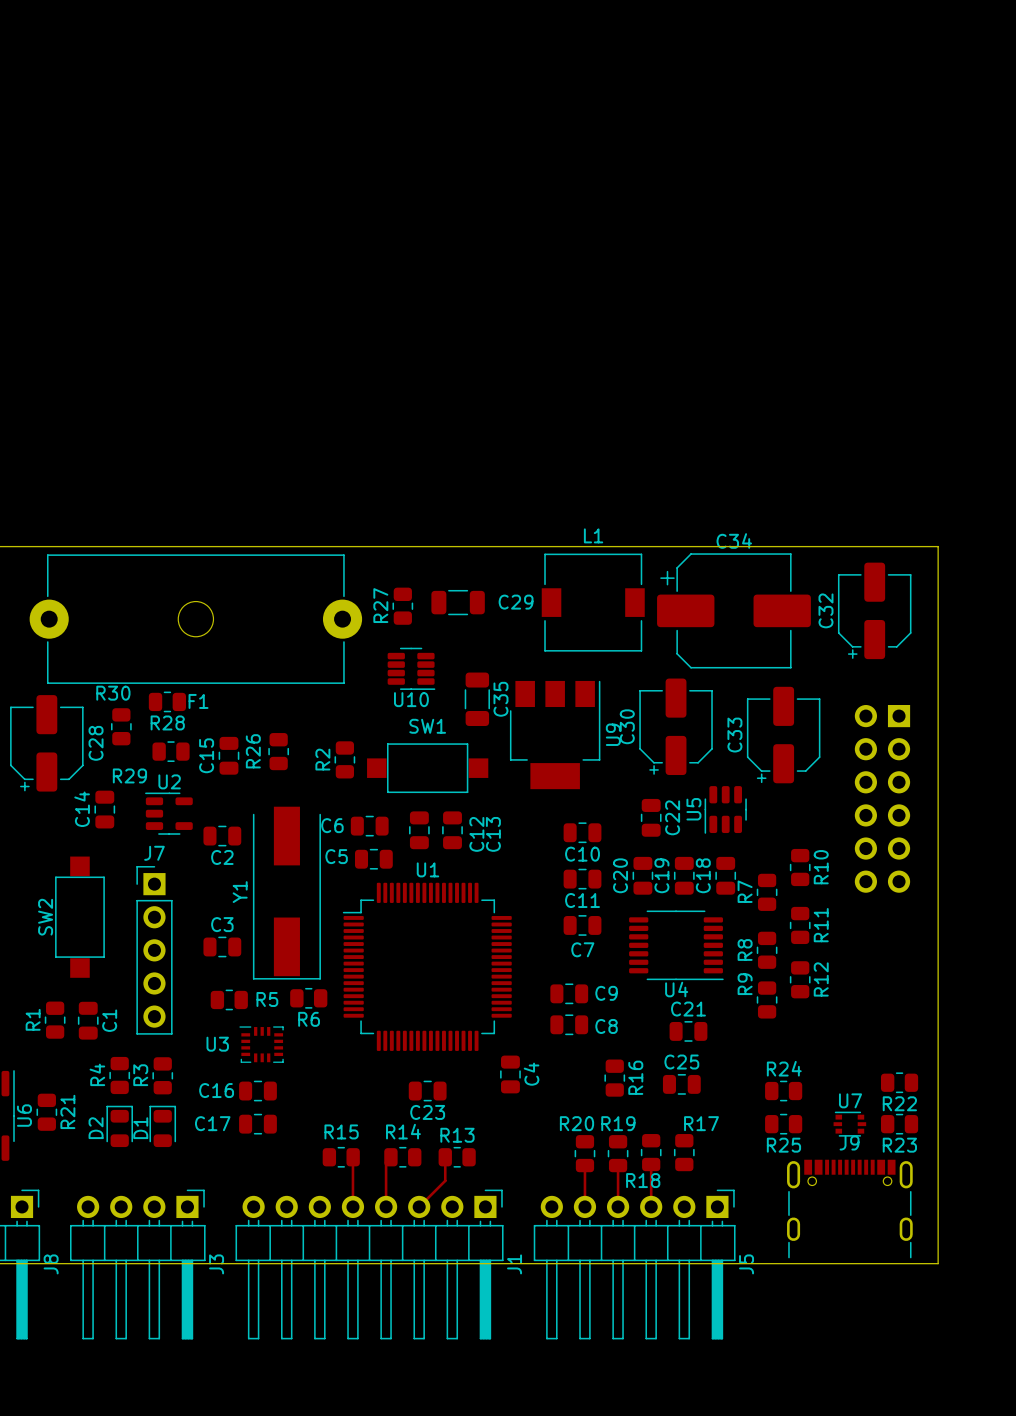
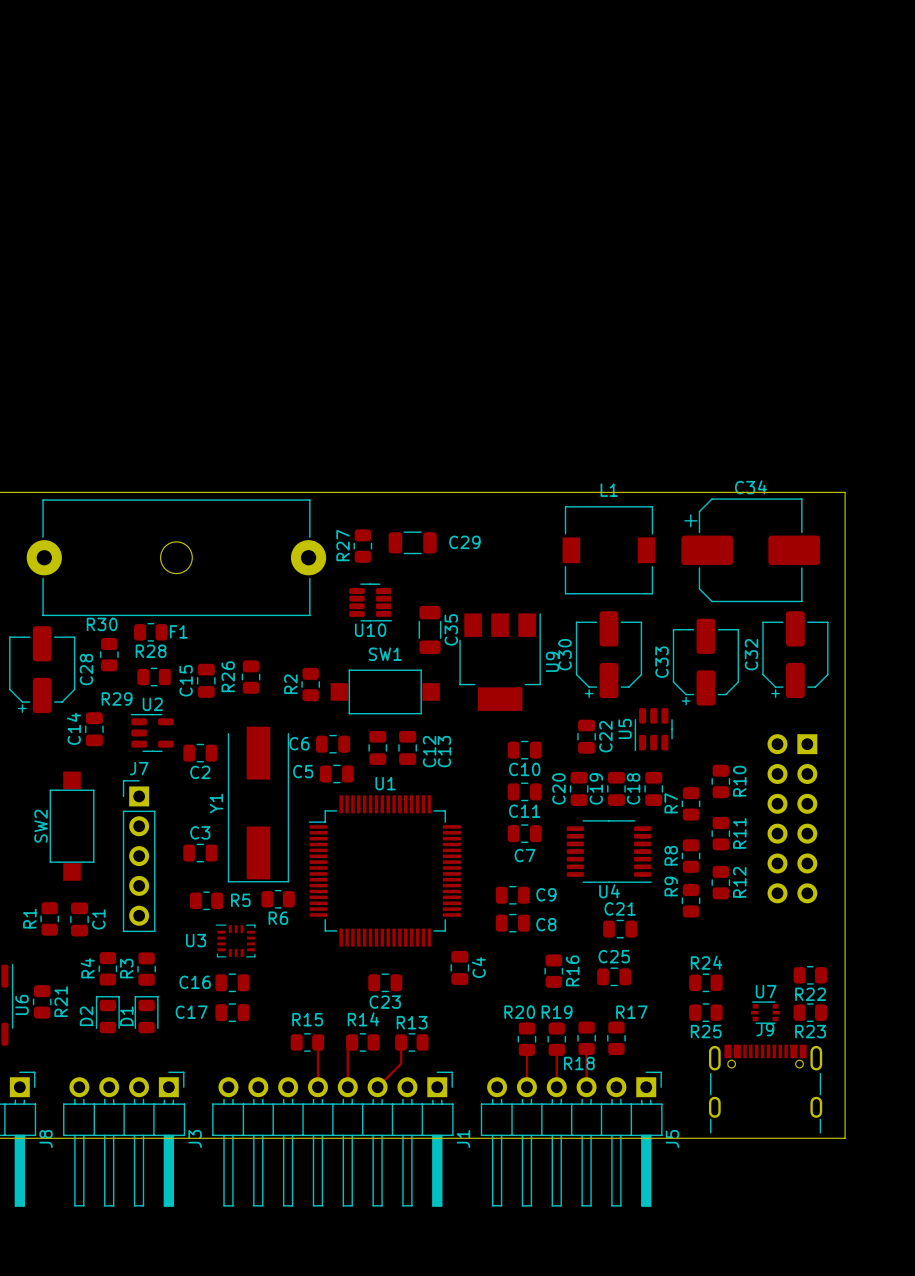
L1 position: (593, 602) -> (608, 550)
C34 position: (733, 610) -> (750, 550)
C32 position: (874, 610) -> (795, 654)
part position: (882, 798) -> (792, 818)

